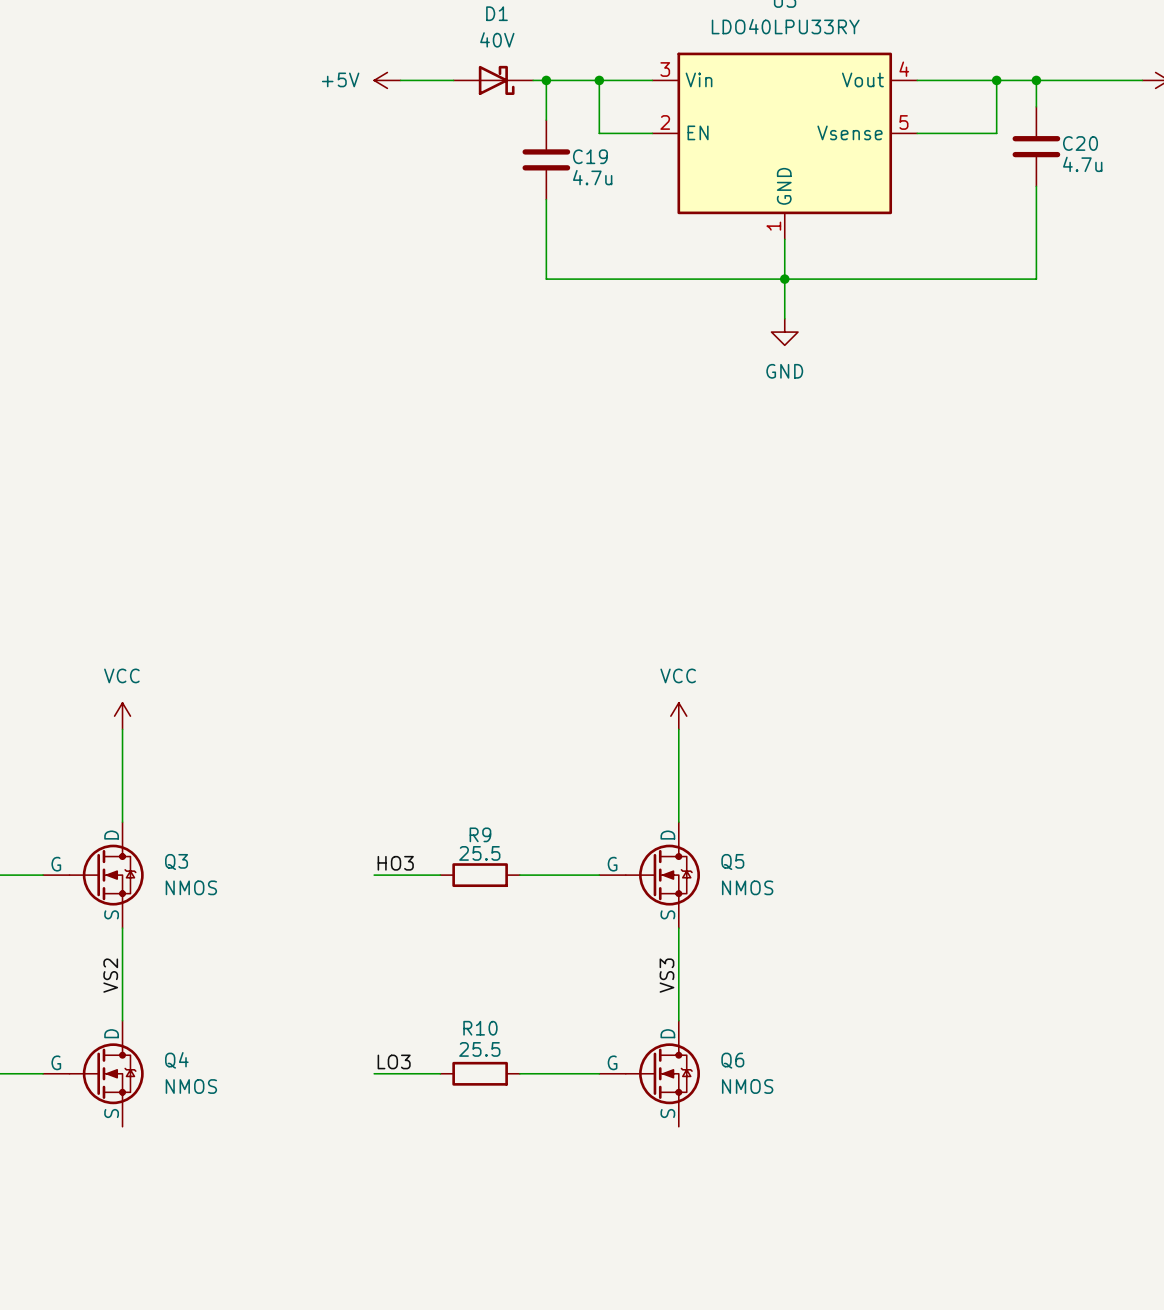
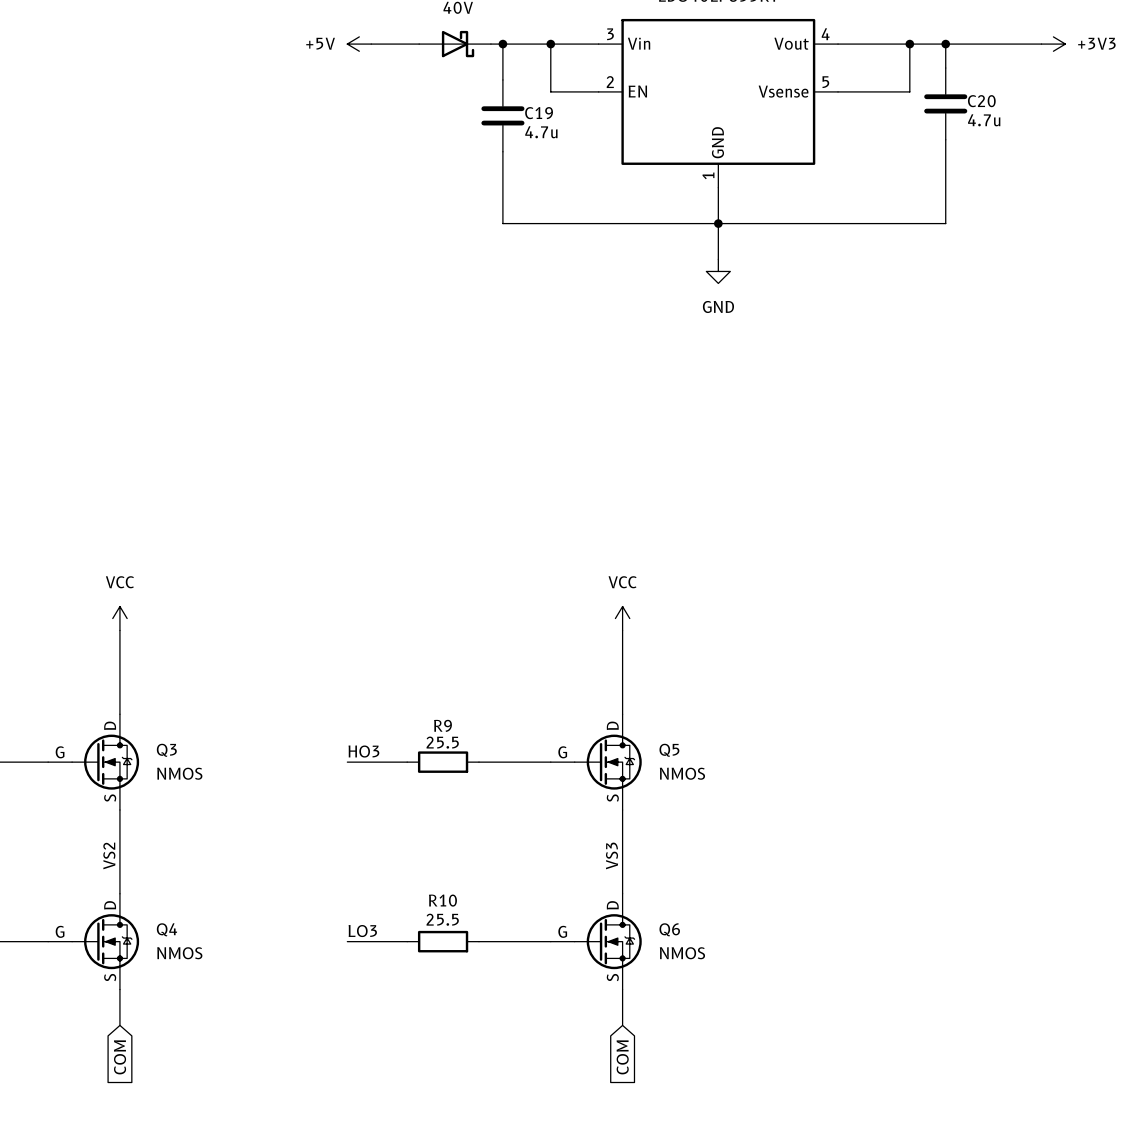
wire: none -> (119, 989) (119, 1025)
wire: none -> (622, 989) (622, 1025)
global label: none -> COM (120, 1057)
global label: none -> COM (622, 1057)

